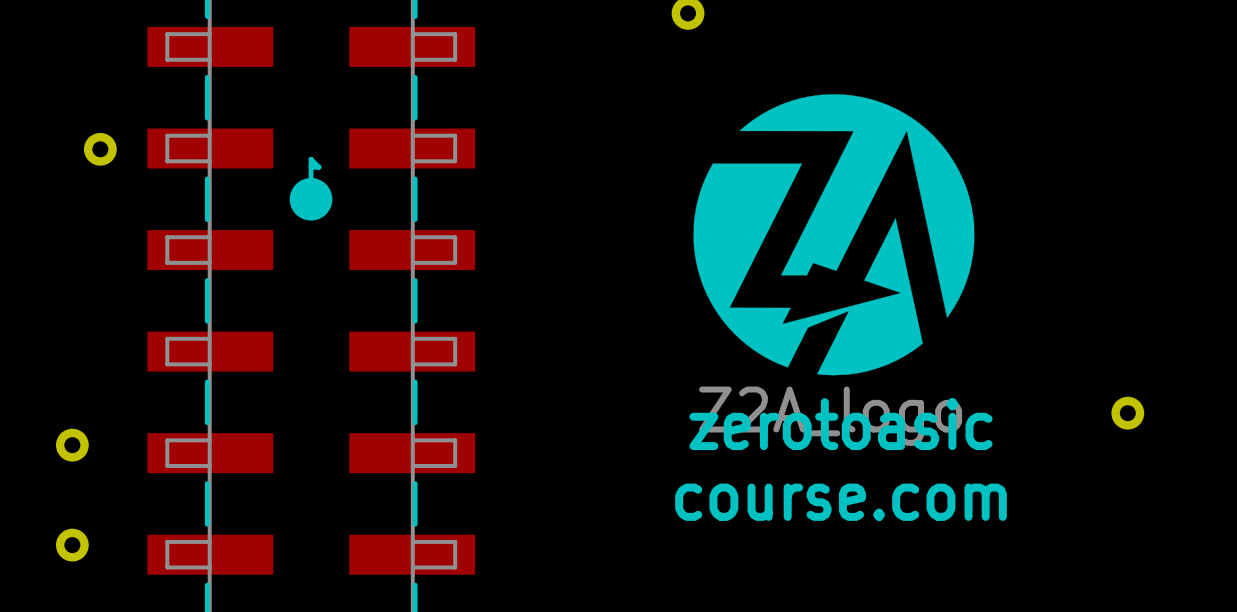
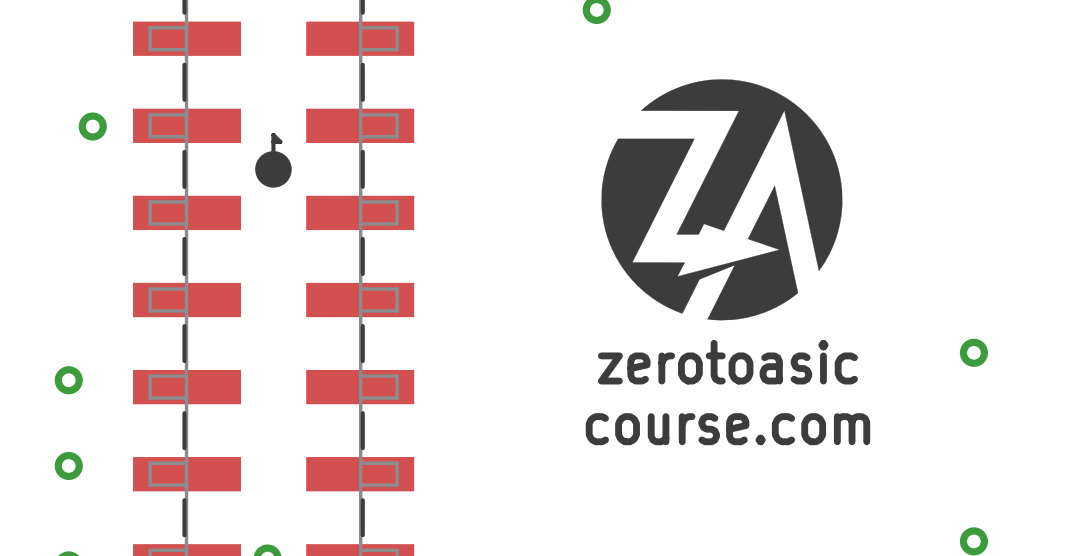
drawing shape: [693, 94, 975, 446] -> [601, 79, 843, 321]

